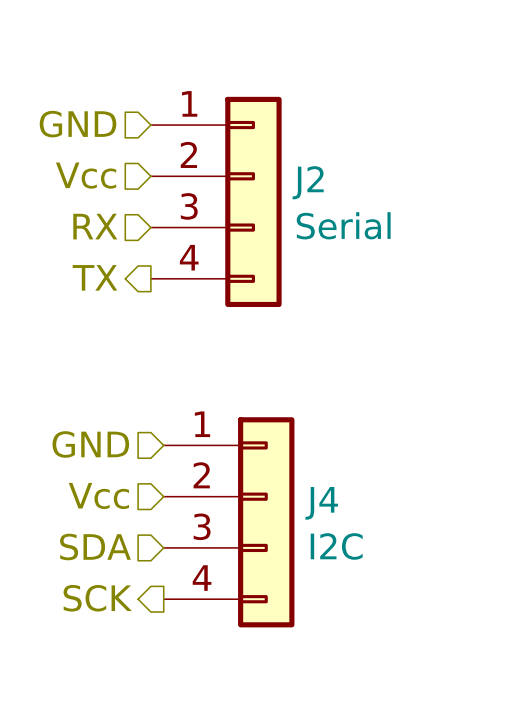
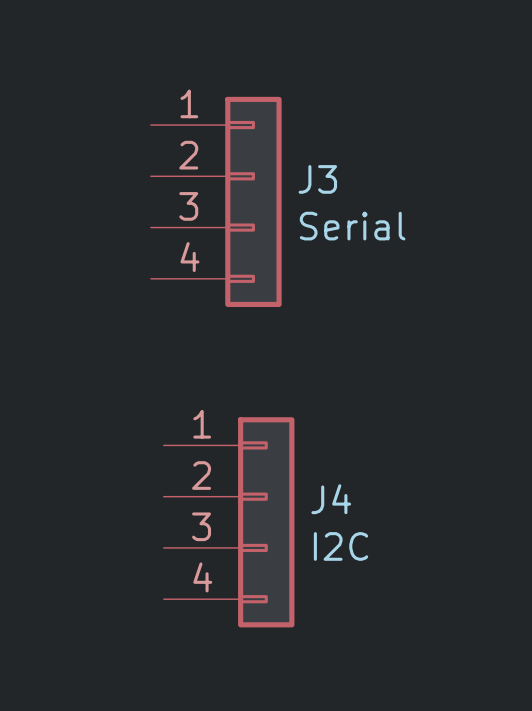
hierarchical label: GND (78, 124) -> none
hierarchical label: Vcc (86, 175) -> none
J2 name: J2 (308, 182) -> J3 (317, 179)
hierarchical label: RX (95, 226) -> none
hierarchical label: TX (94, 277) -> none
hierarchical label: GND (90, 444) -> none
hierarchical label: Vcc (98, 495) -> none
hierarchical label: SDA (95, 546) -> none
hierarchical label: SCK (97, 598) -> none

